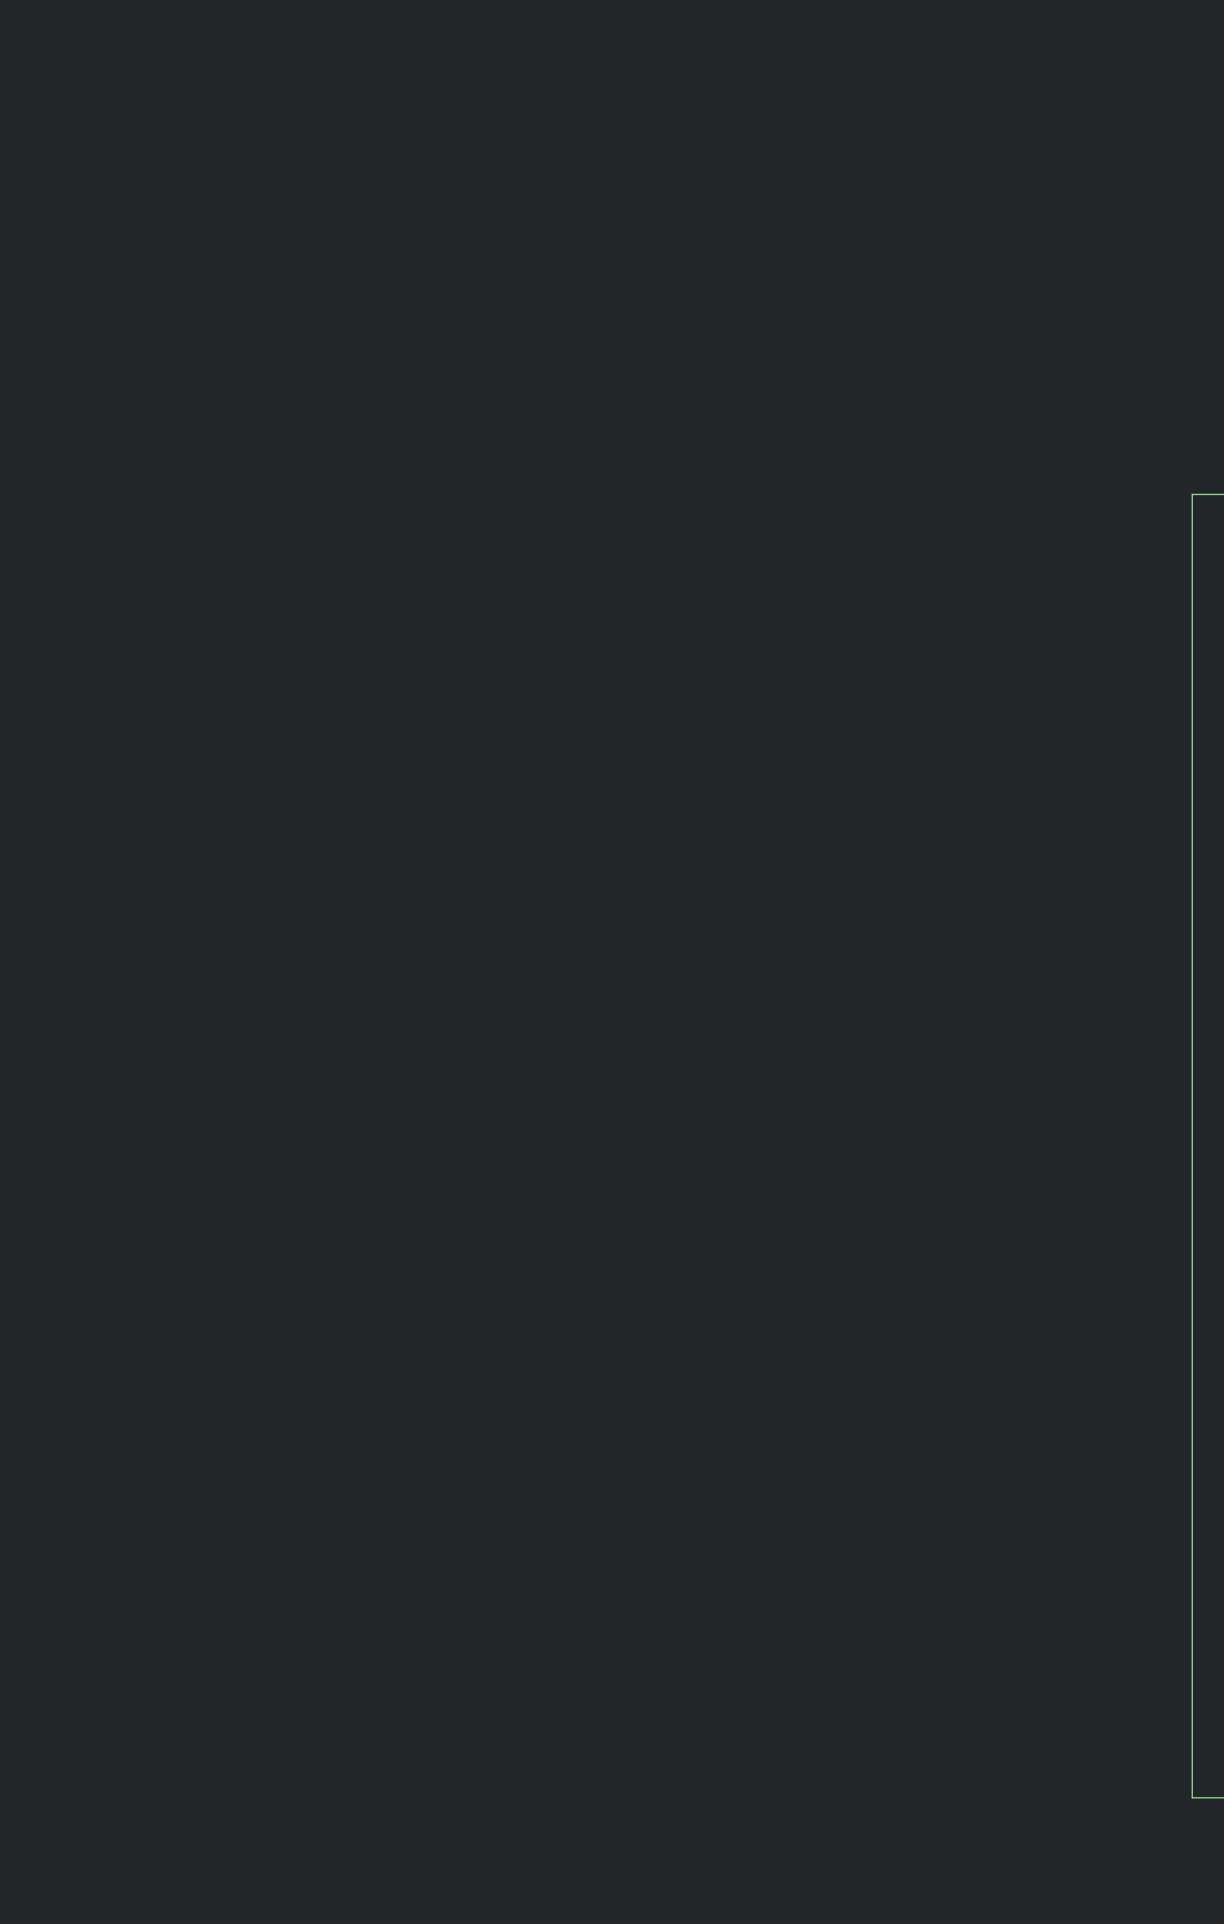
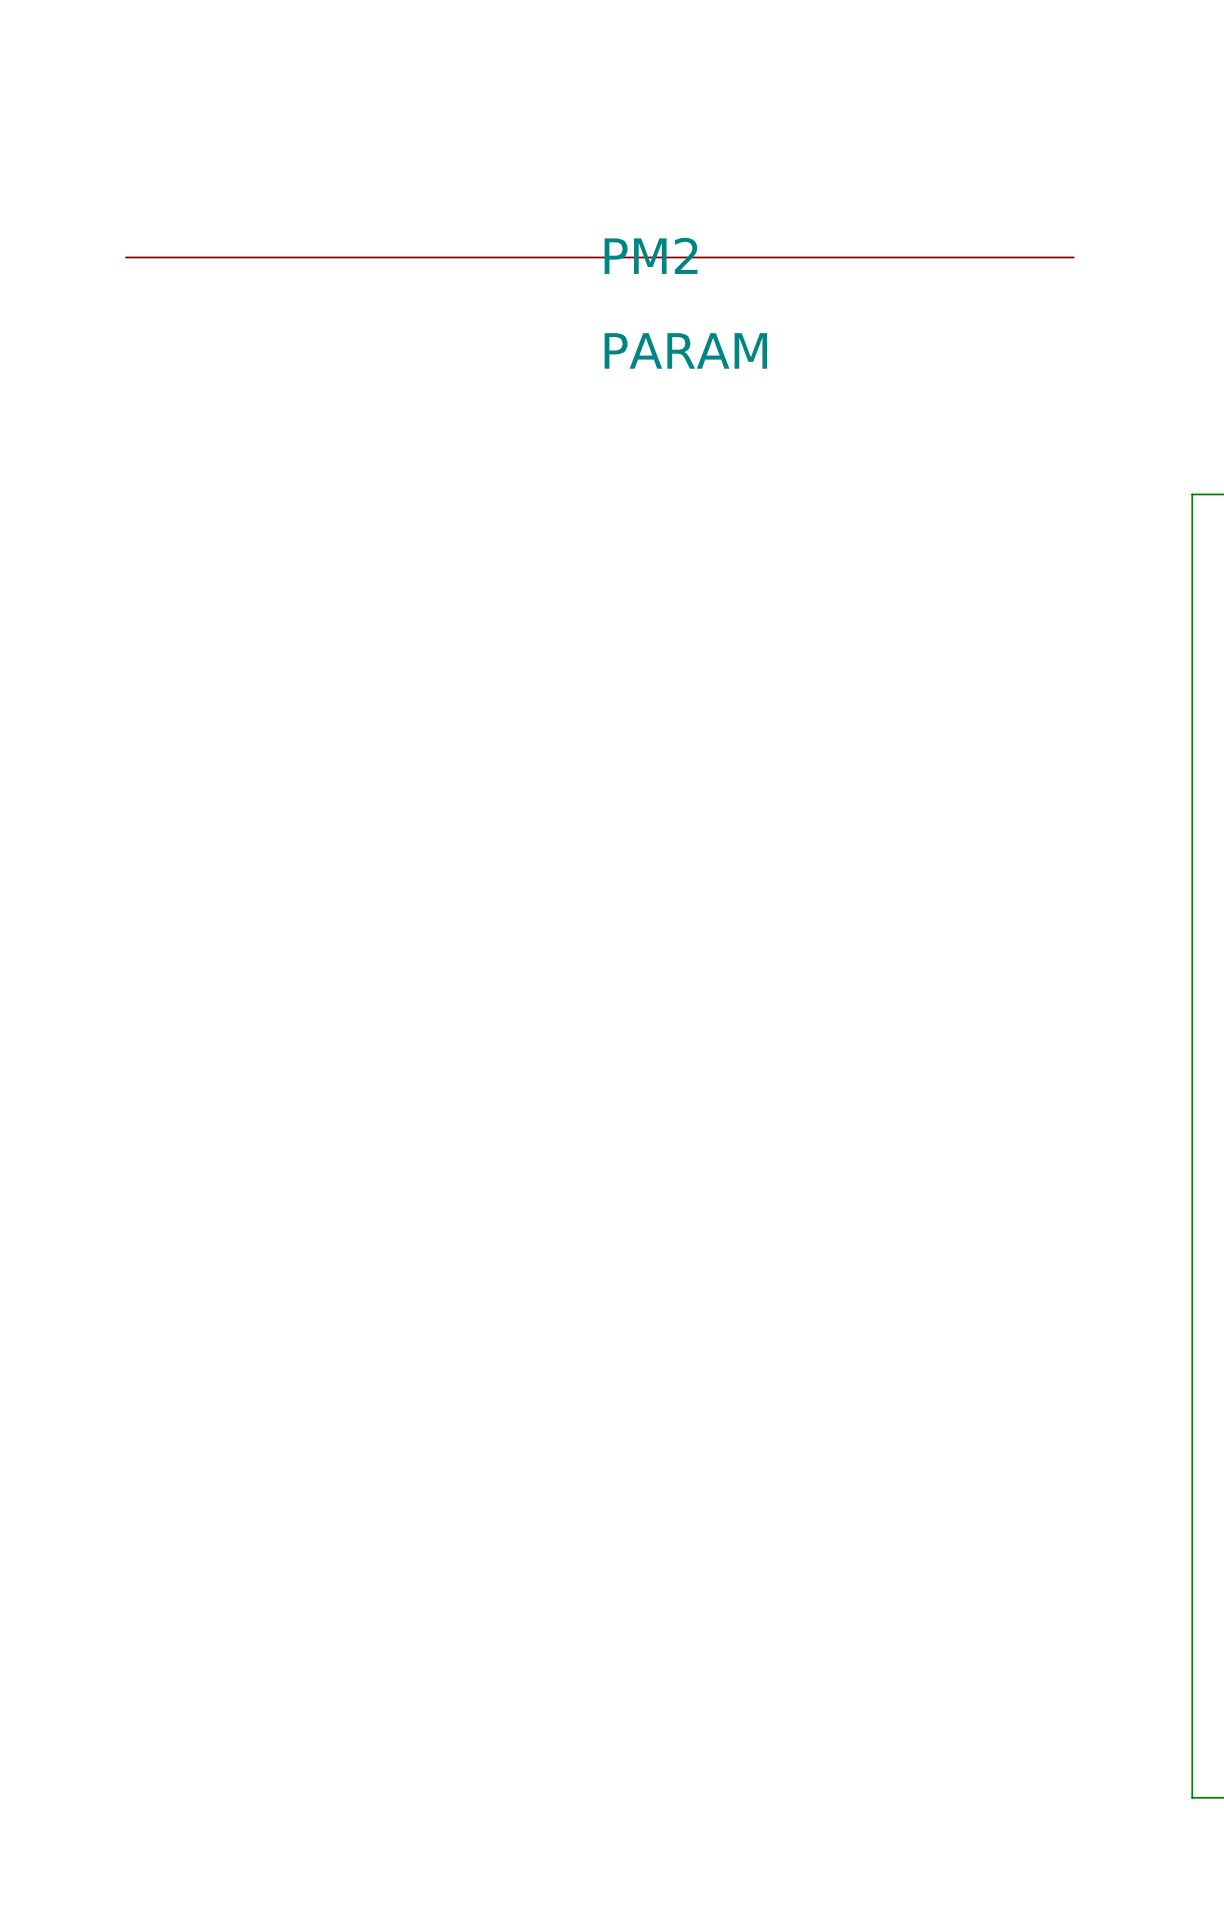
PM2: none -> PARAM (599, 257)

